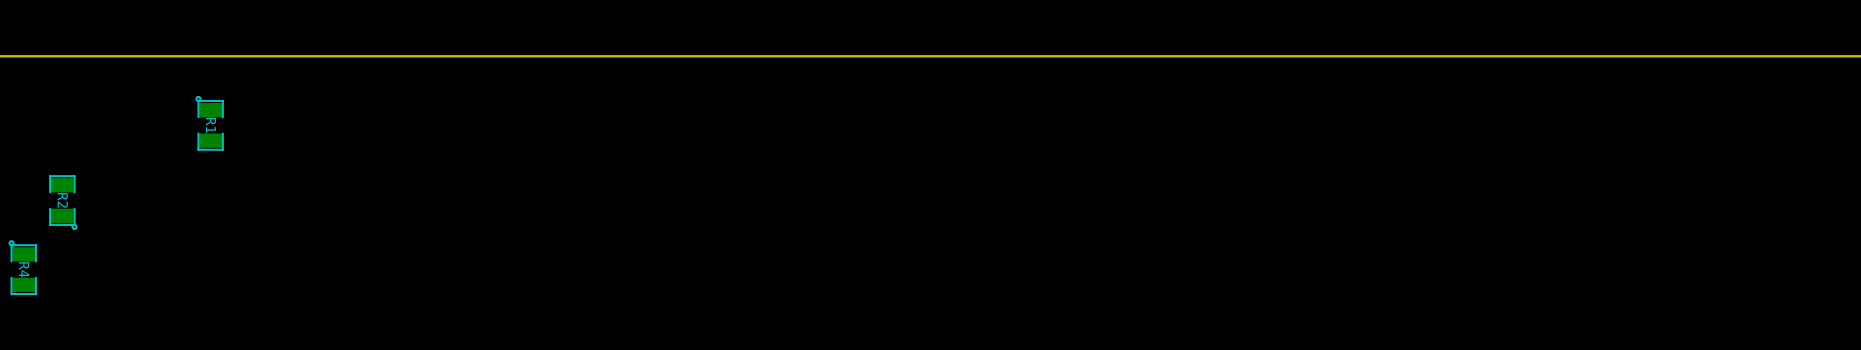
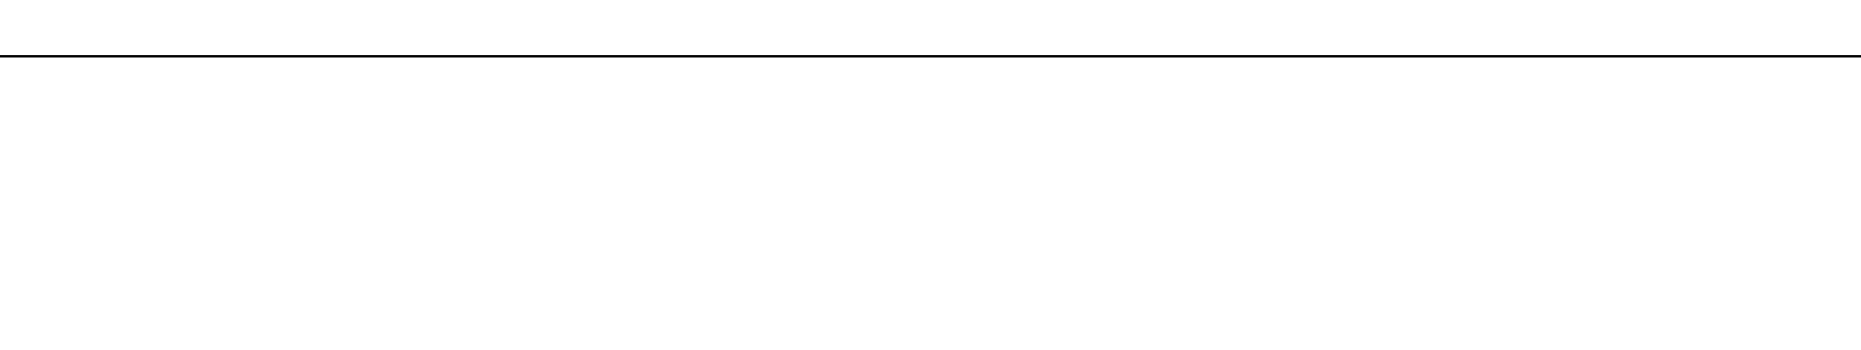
R1: (209, 123) -> none
R2: (63, 202) -> none
R4: (22, 267) -> none

